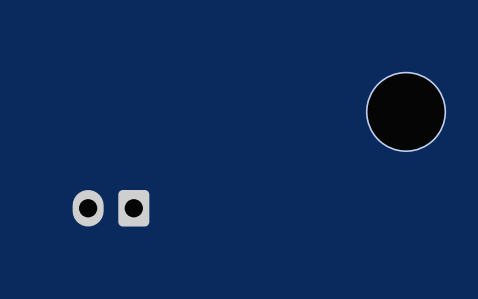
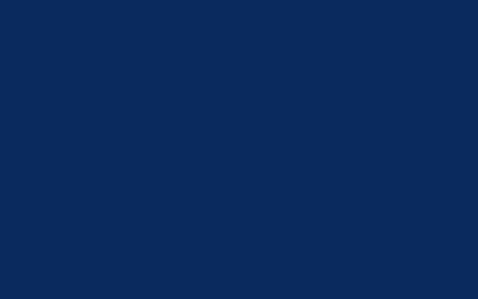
part: (406, 111) -> none
part: (110, 208) -> none

